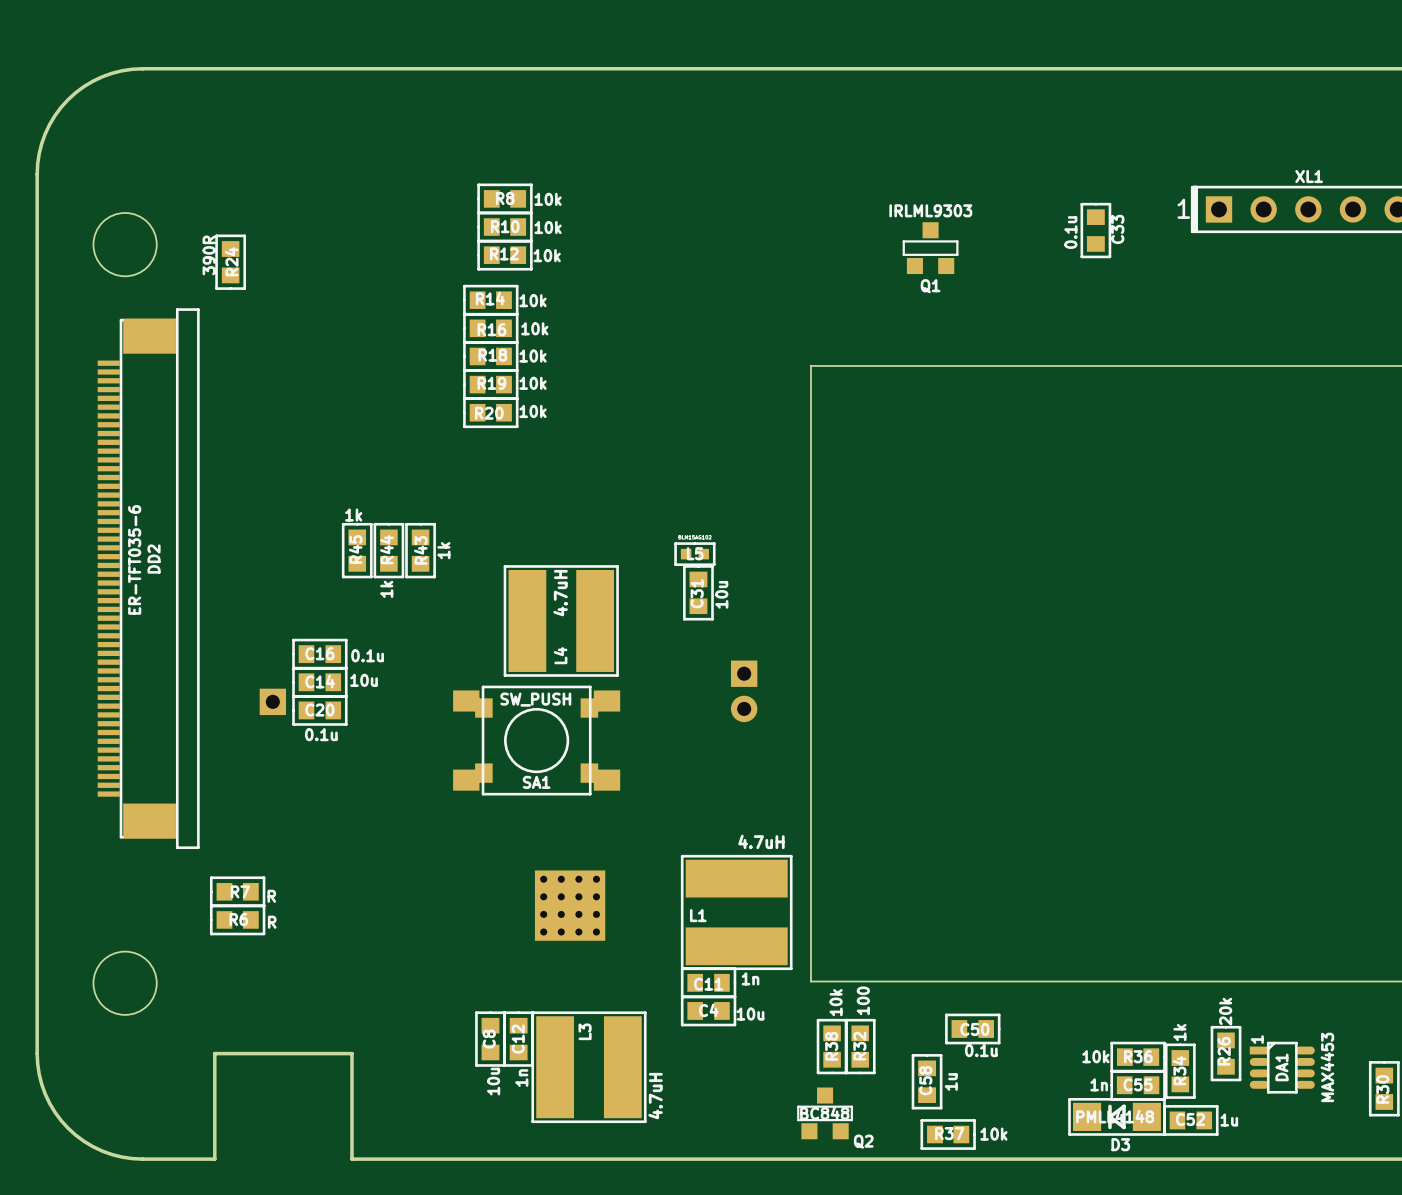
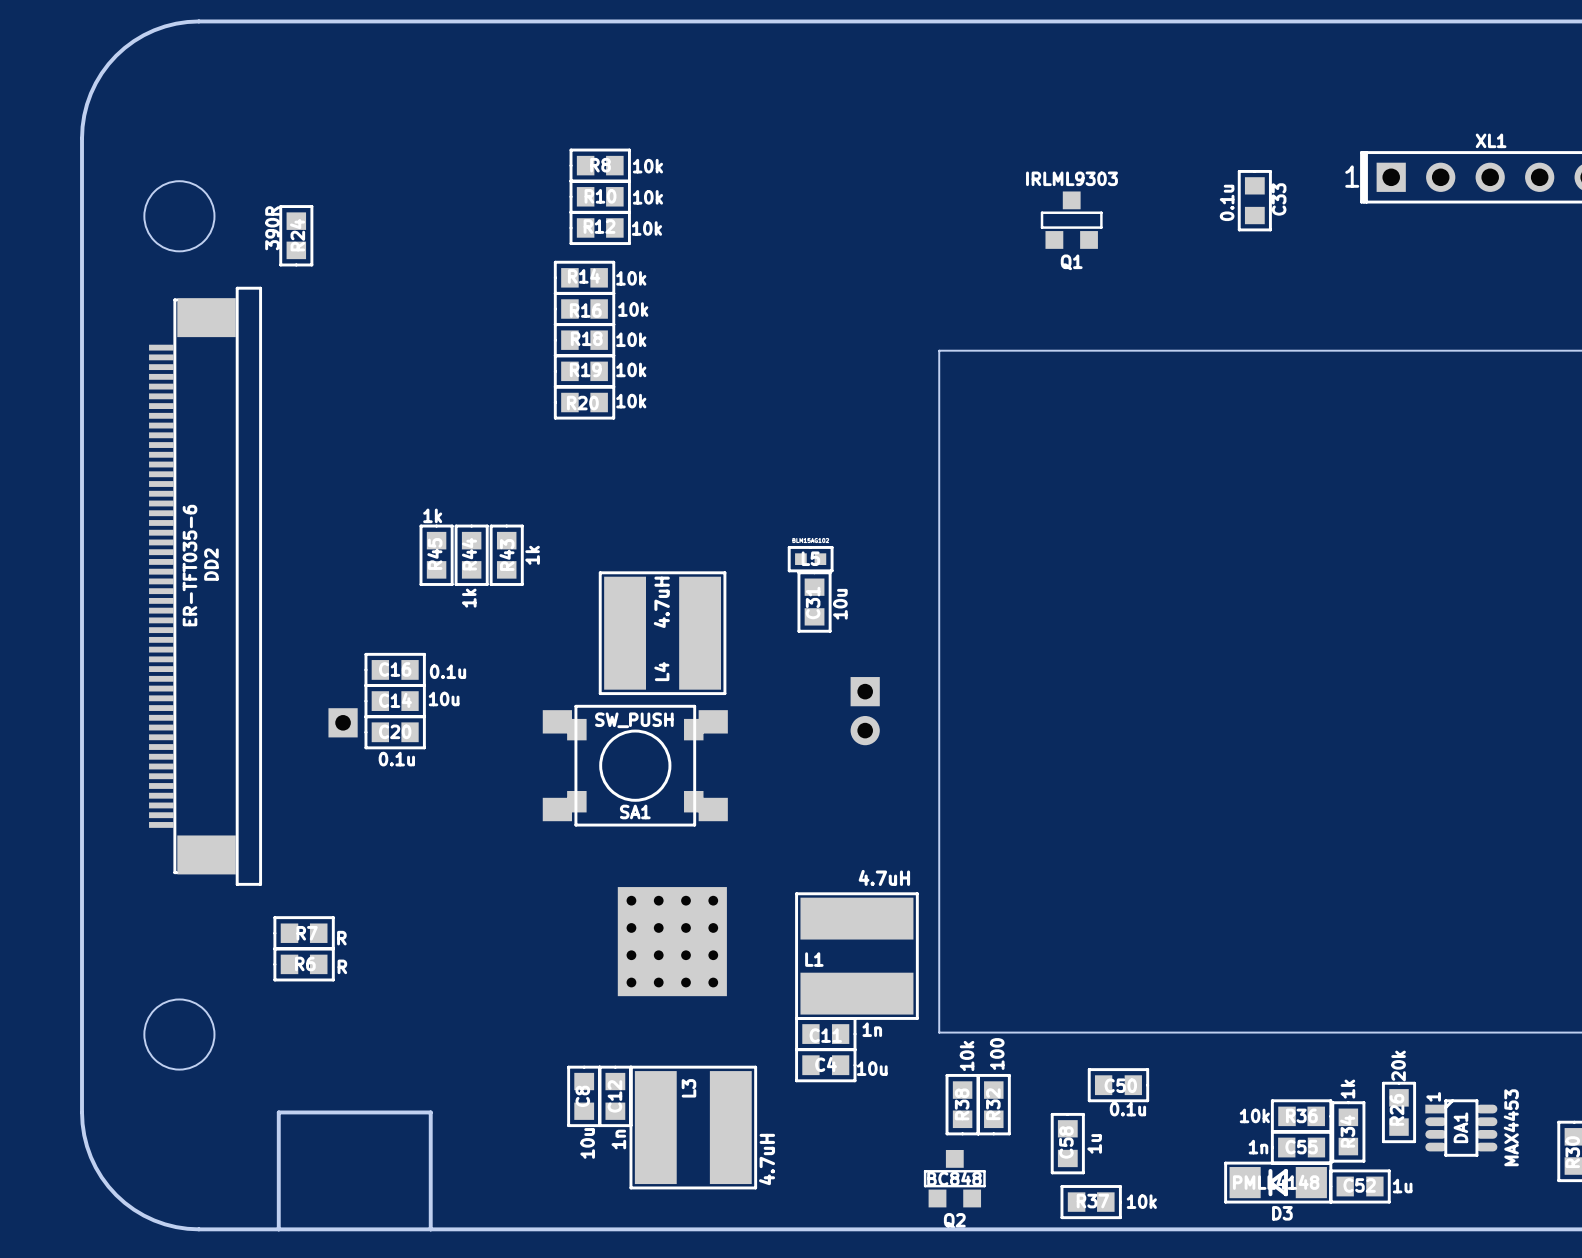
part footprint: [534, 870, 606, 941] -> [617, 887, 727, 997]
Q2 name position: Q2 (863, 1141) -> Q2 (954, 1220)
board edge: none -> (278, 1229) (430, 1229) (278, 1229)

